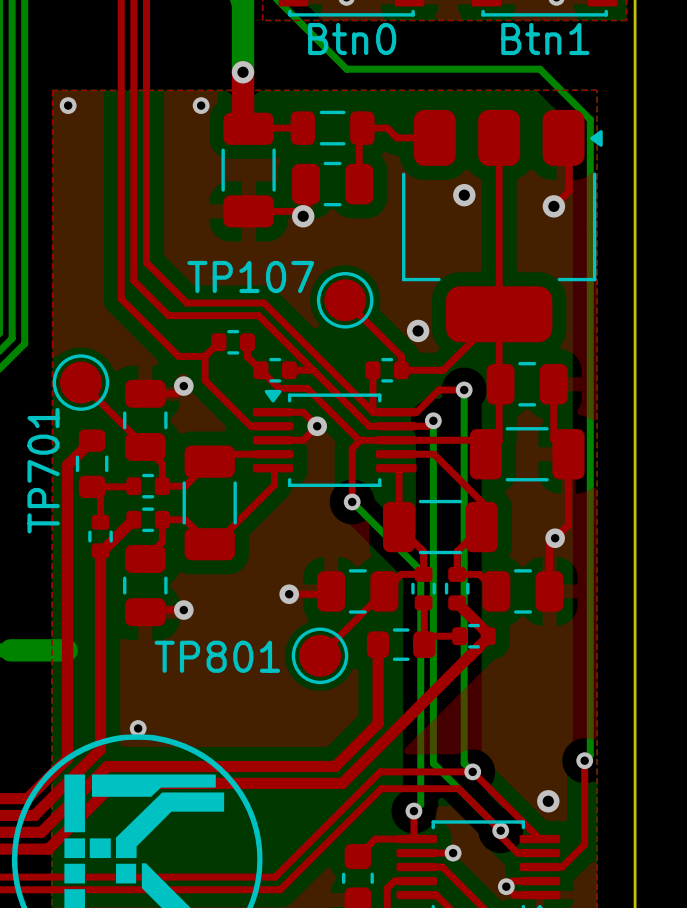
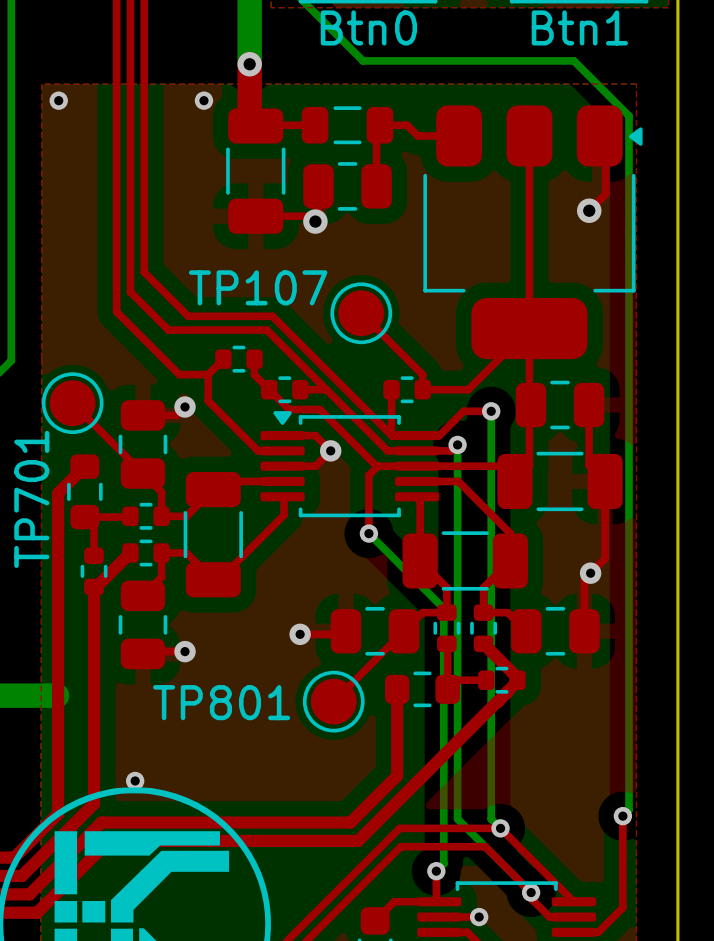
via: (464, 195) -> none
via: (418, 330) -> none
via: (548, 801) -> none

